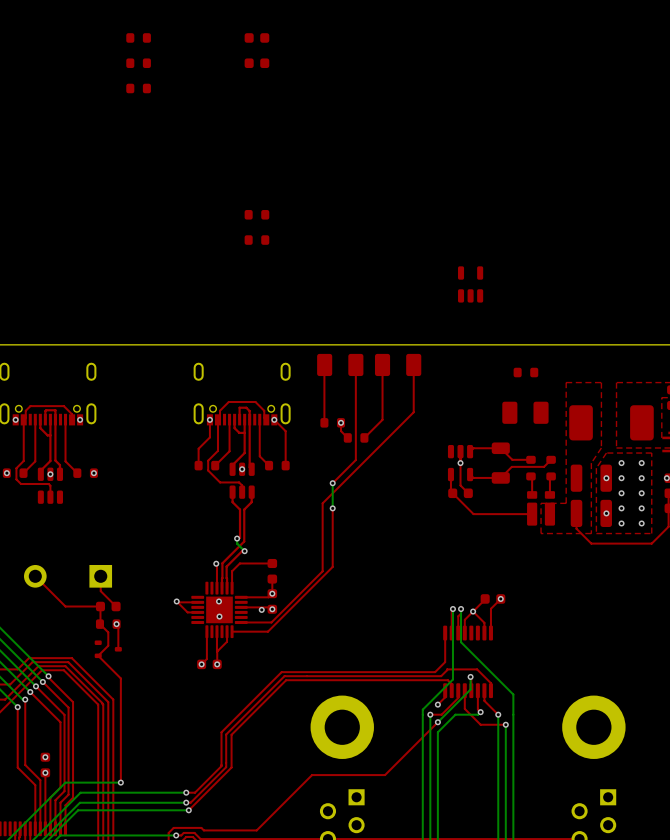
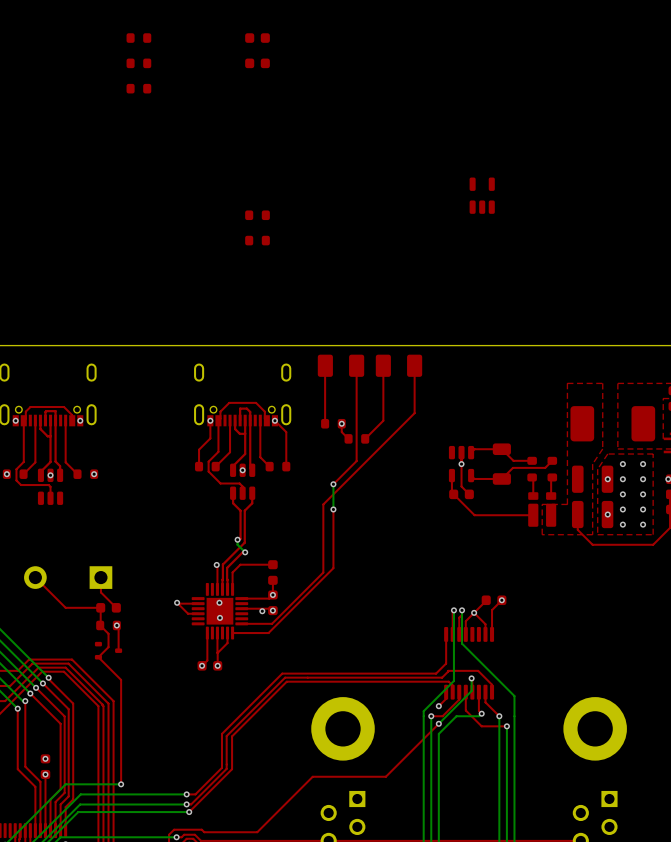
part position: (470, 284) -> (482, 195)
part: (525, 372) -> none
part: (525, 412) -> none

